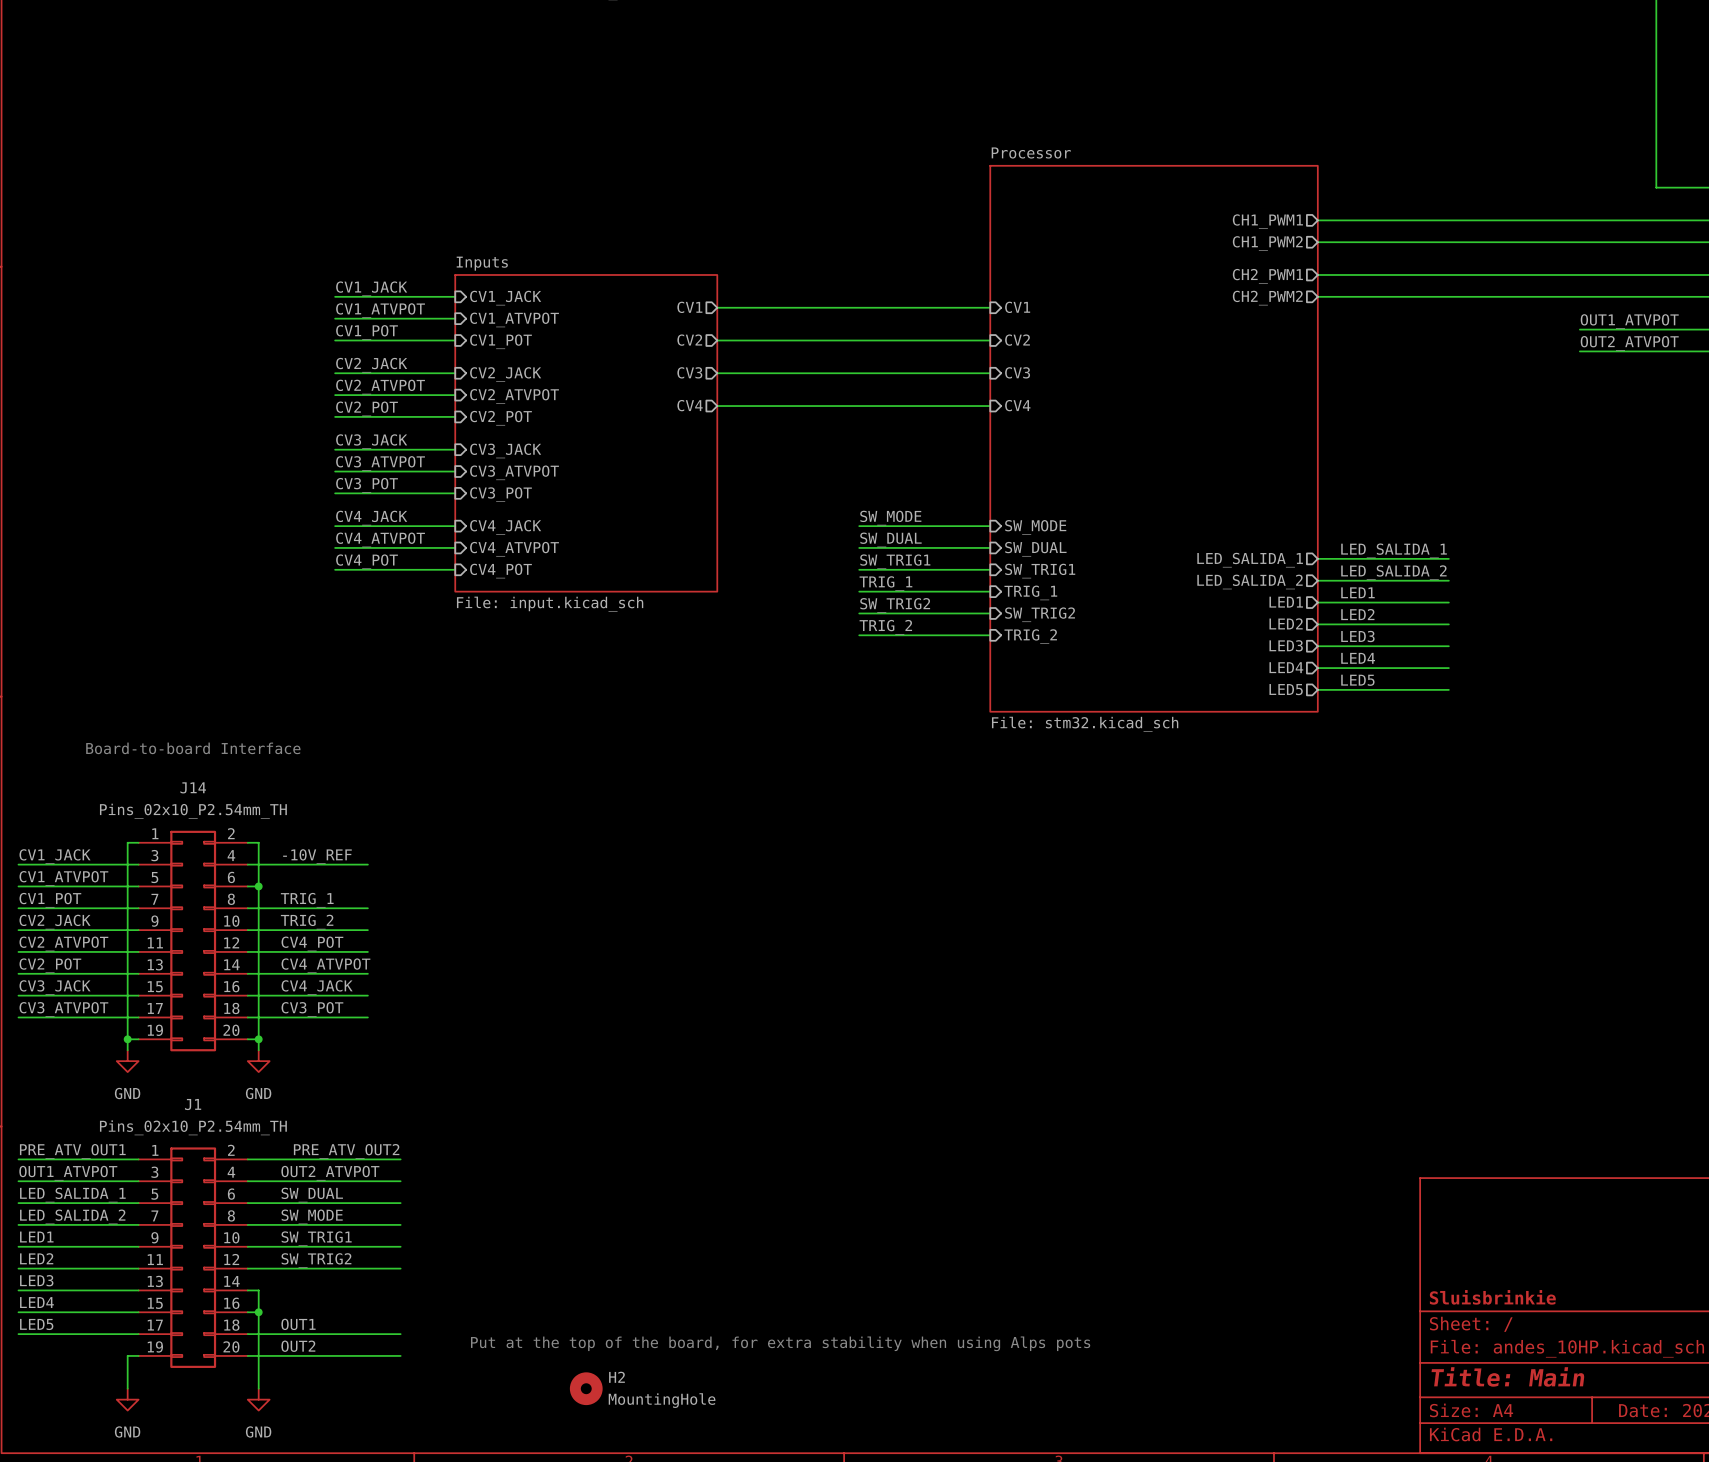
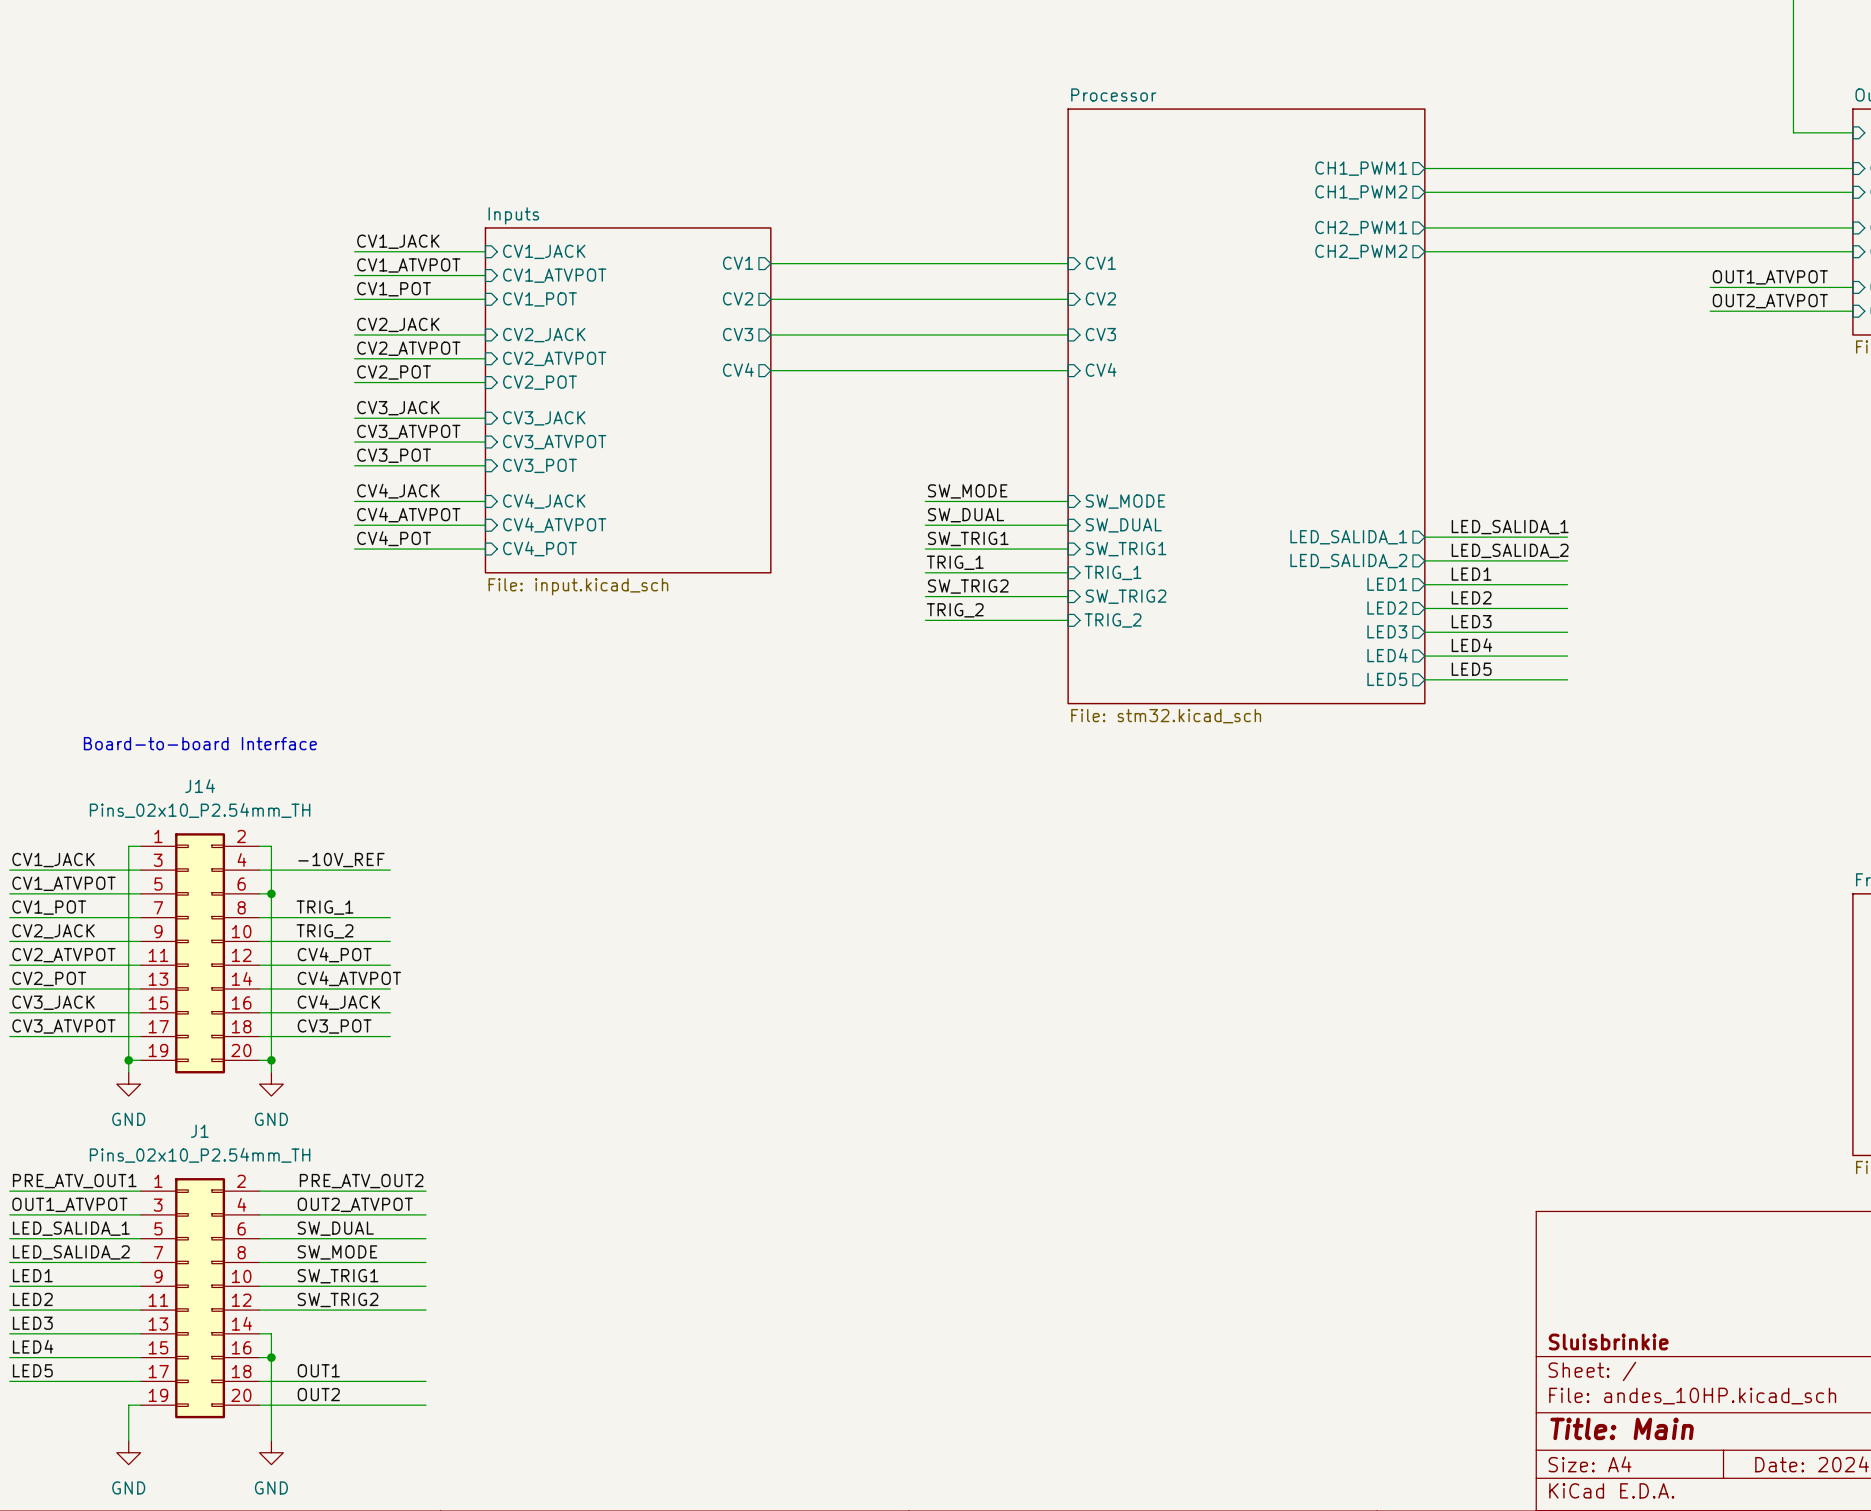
text: Put at the top of the board, for extra stability when using Alps pots (780, 1343) -> none
H2: MountingHole (586, 1388) -> none

